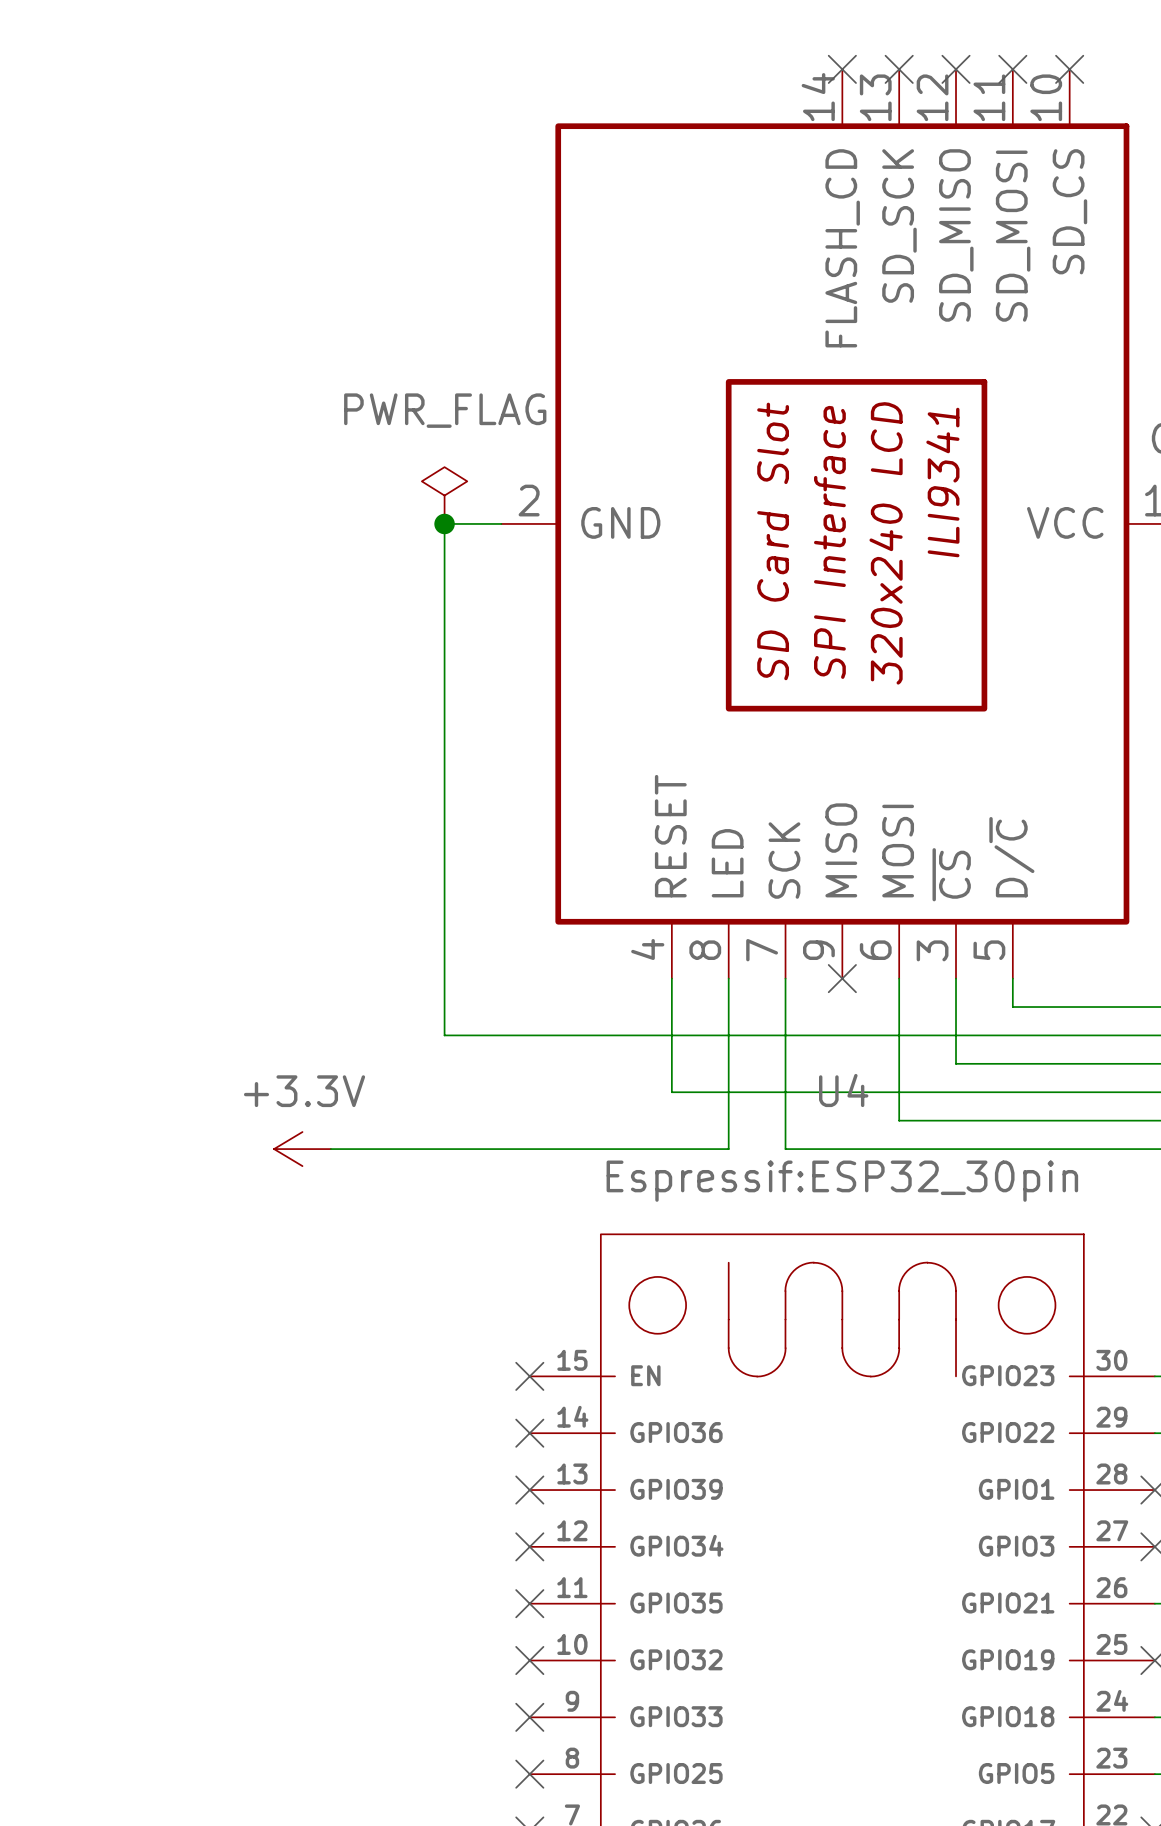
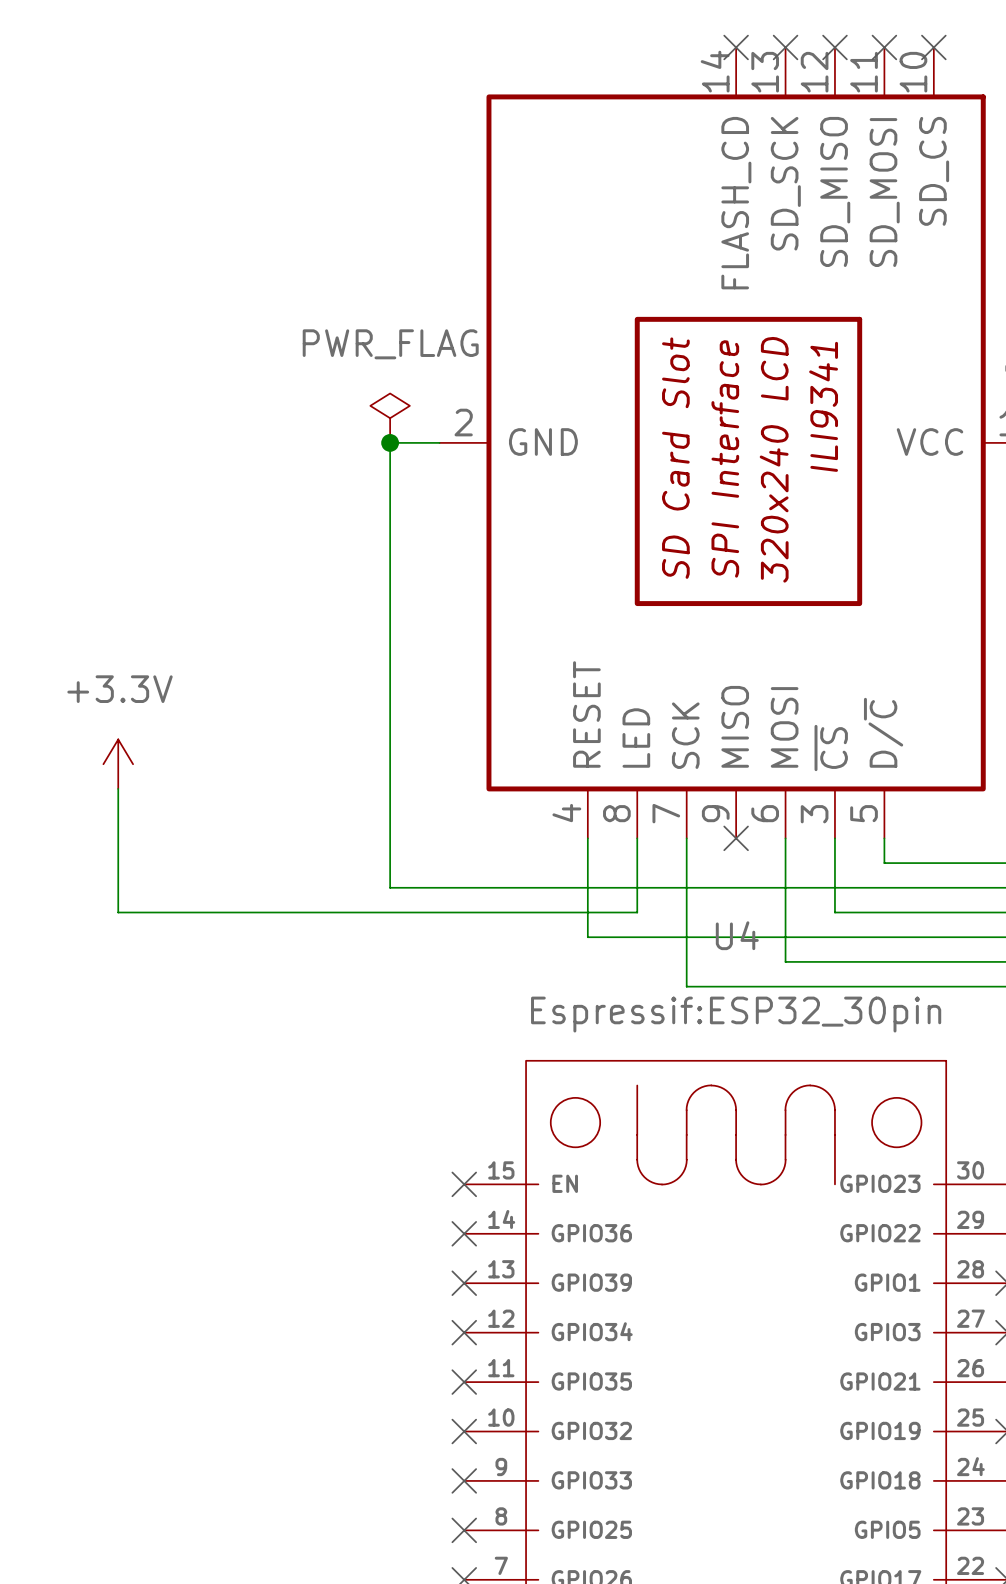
wire: (728, 1063) (728, 1149) (330, 1149) -> (637, 912) (118, 912) (118, 788)
power symbol rotation: 0° (302, 1149) -> 90° clockwise (118, 764)
power symbol position: +3.3V (302, 1149) -> +3.3V (118, 764)

